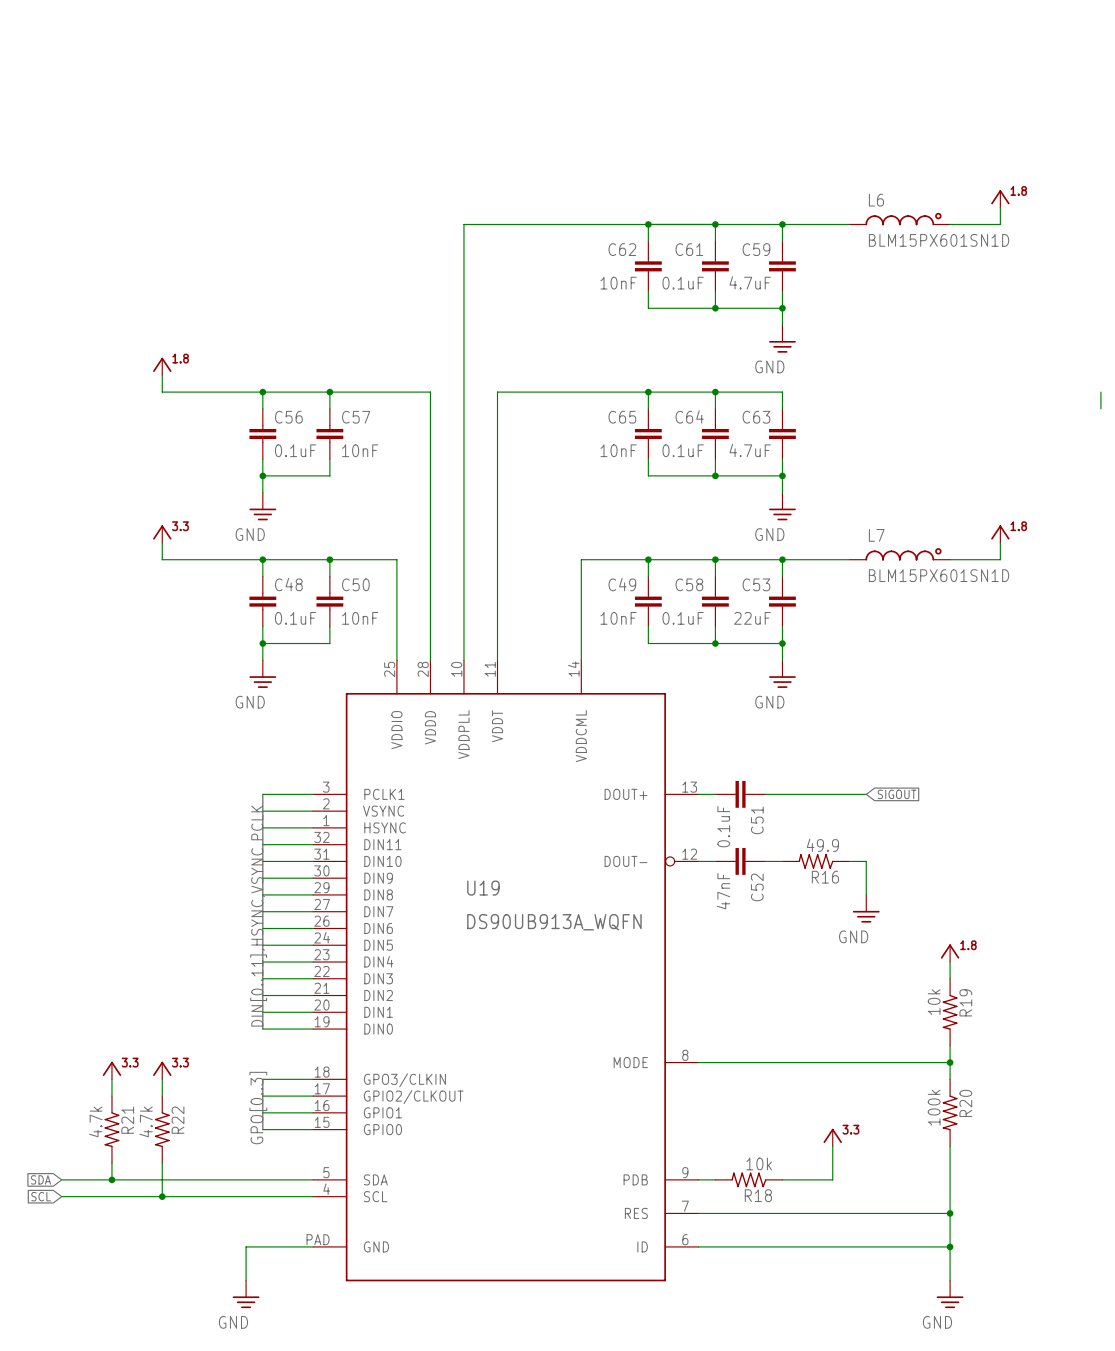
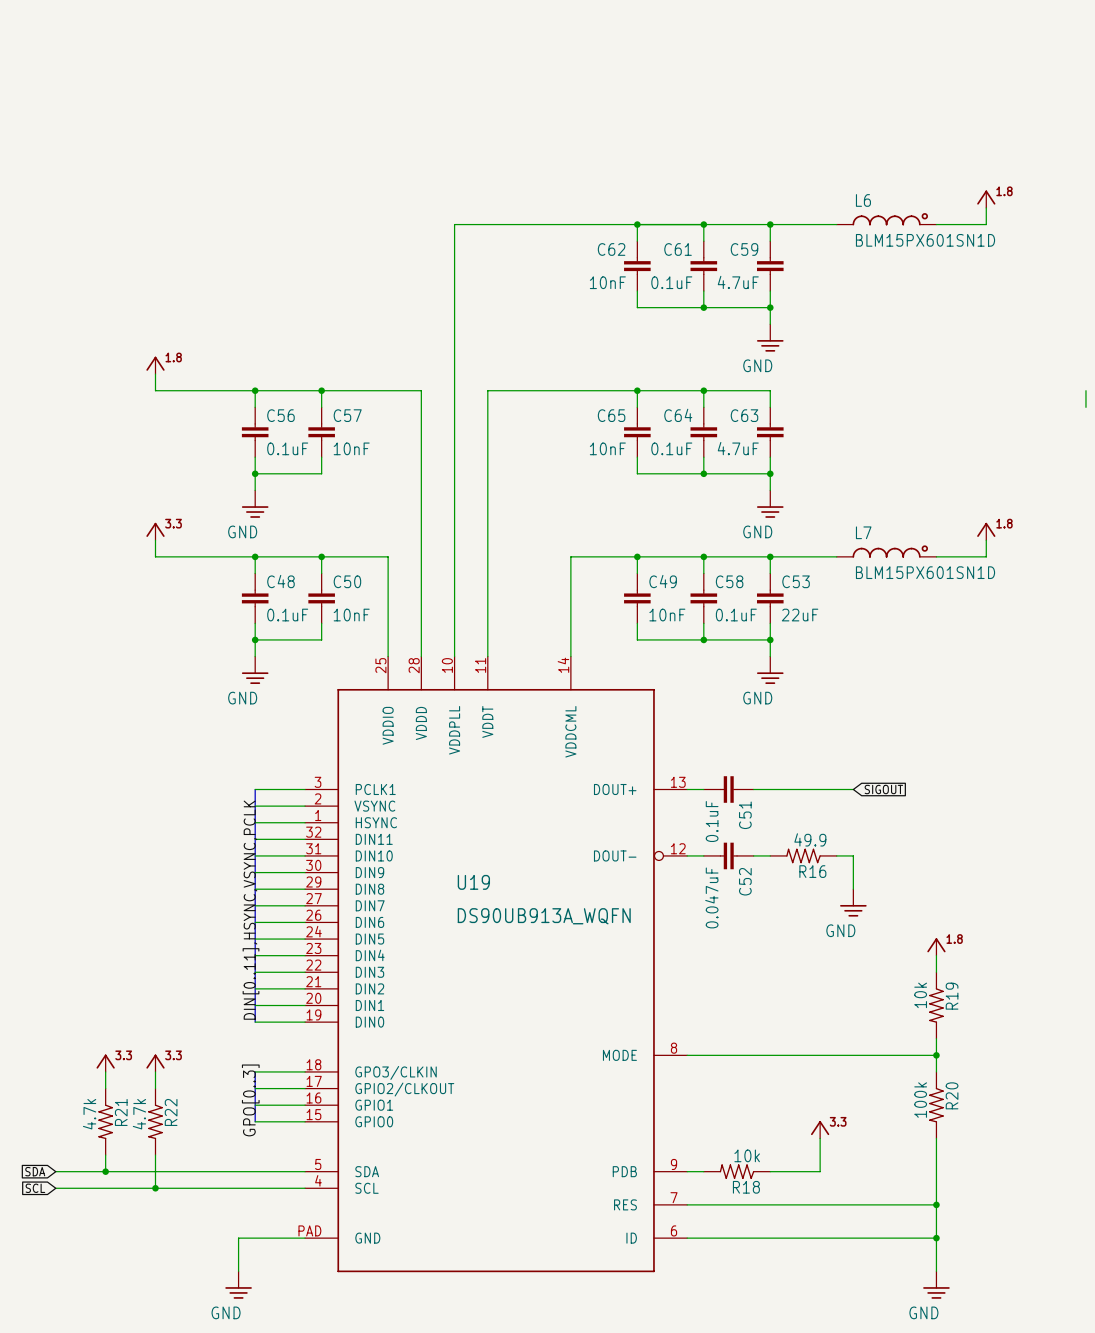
C49 name position: C49 (622, 584) -> C49 (663, 581)
C58 name position: C58 (689, 584) -> C58 (729, 581)
C53 name position: C53 (756, 584) -> C53 (796, 581)
C49 value position: 10nF (618, 618) -> 10nF (667, 615)
C58 value position: 0.1uF (683, 618) -> 0.1uF (736, 615)
C53 value position: 22uF (752, 618) -> 22uF (800, 615)
C52 value: 47nF (723, 891) -> 0.047uF (711, 897)

